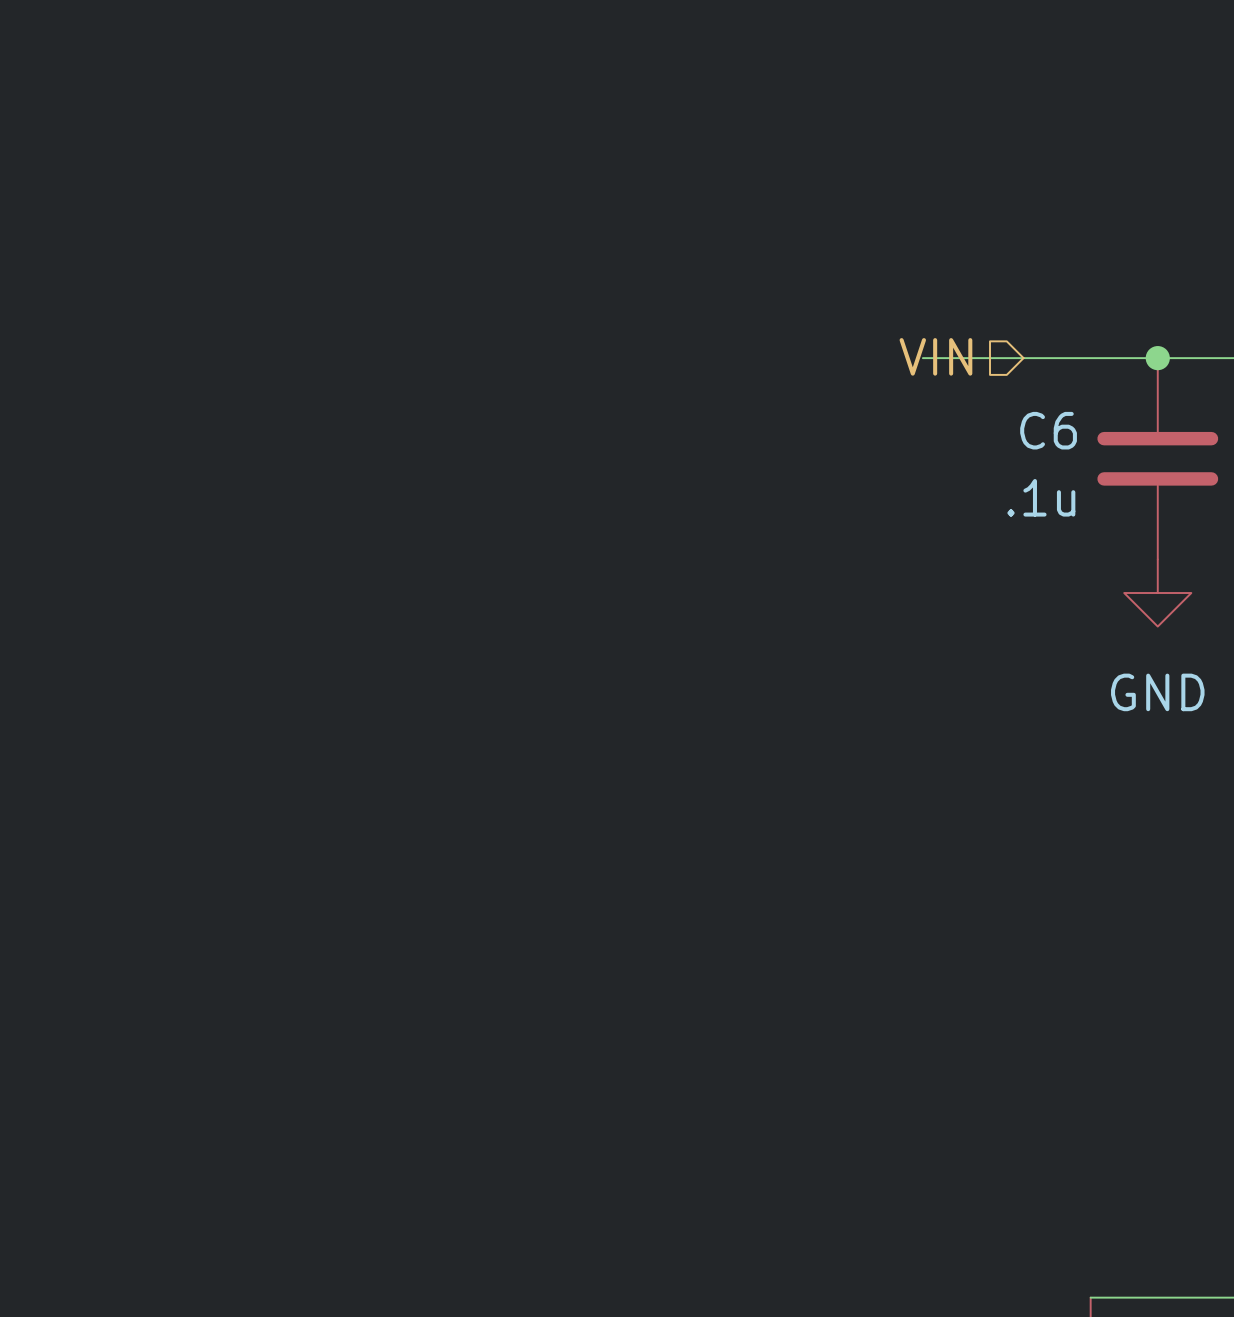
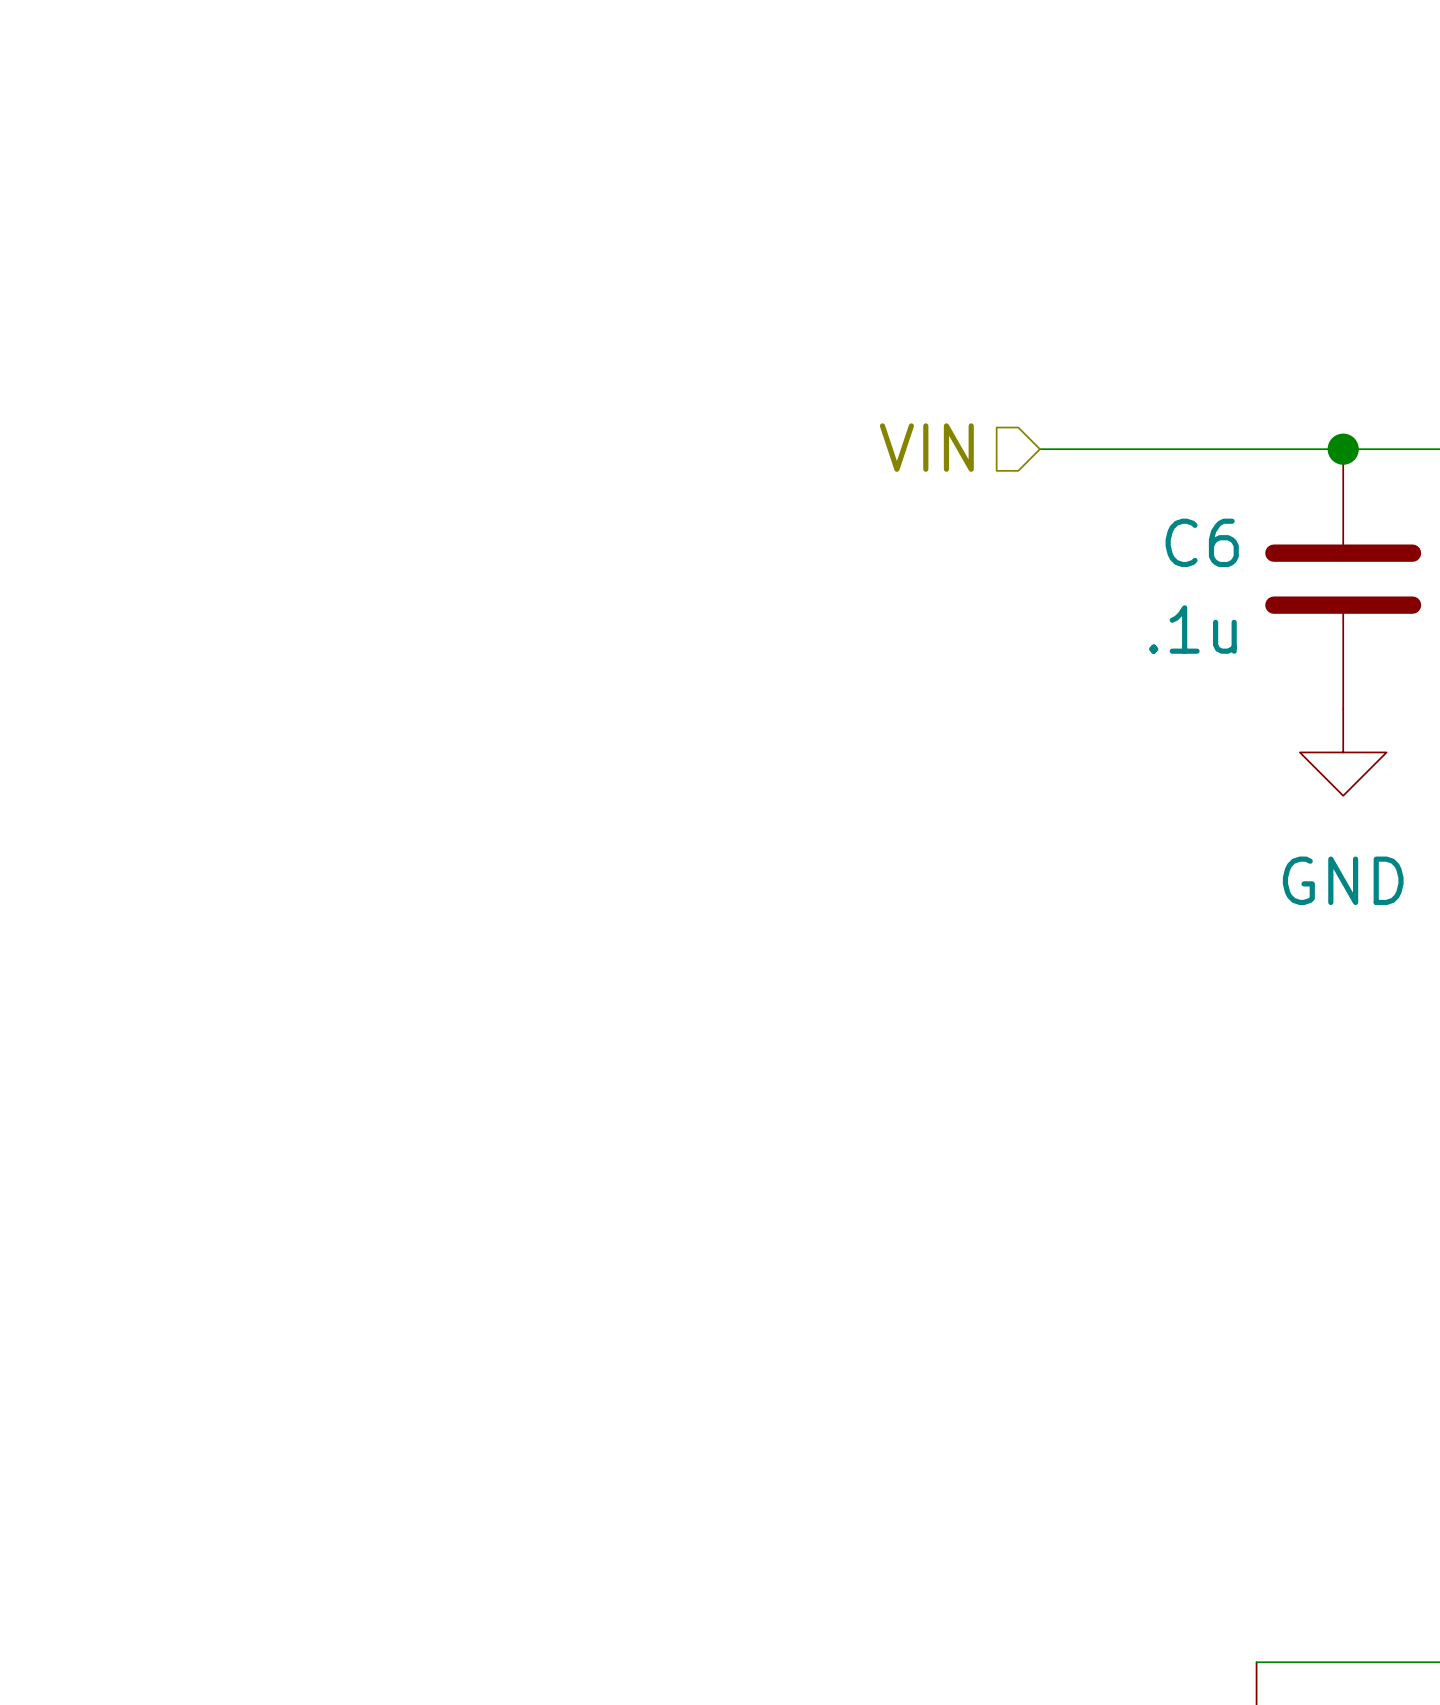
hierarchical label position: VIN (935, 356) -> VIN (926, 447)

